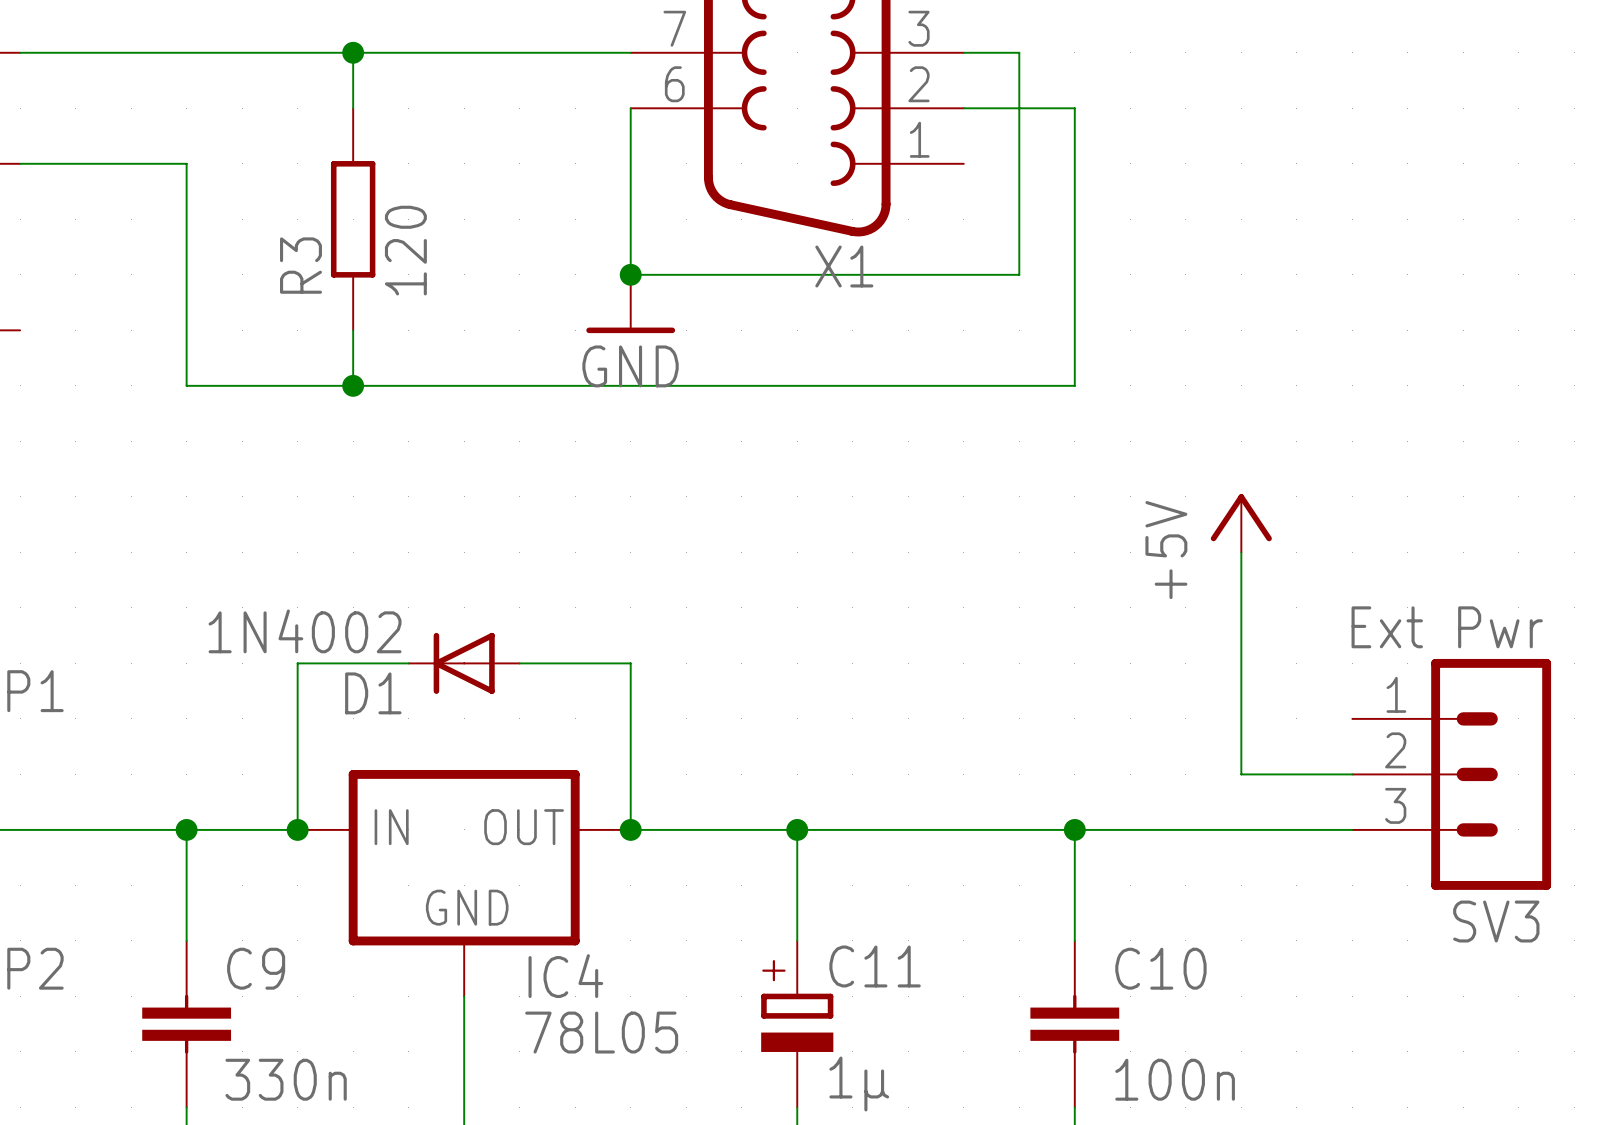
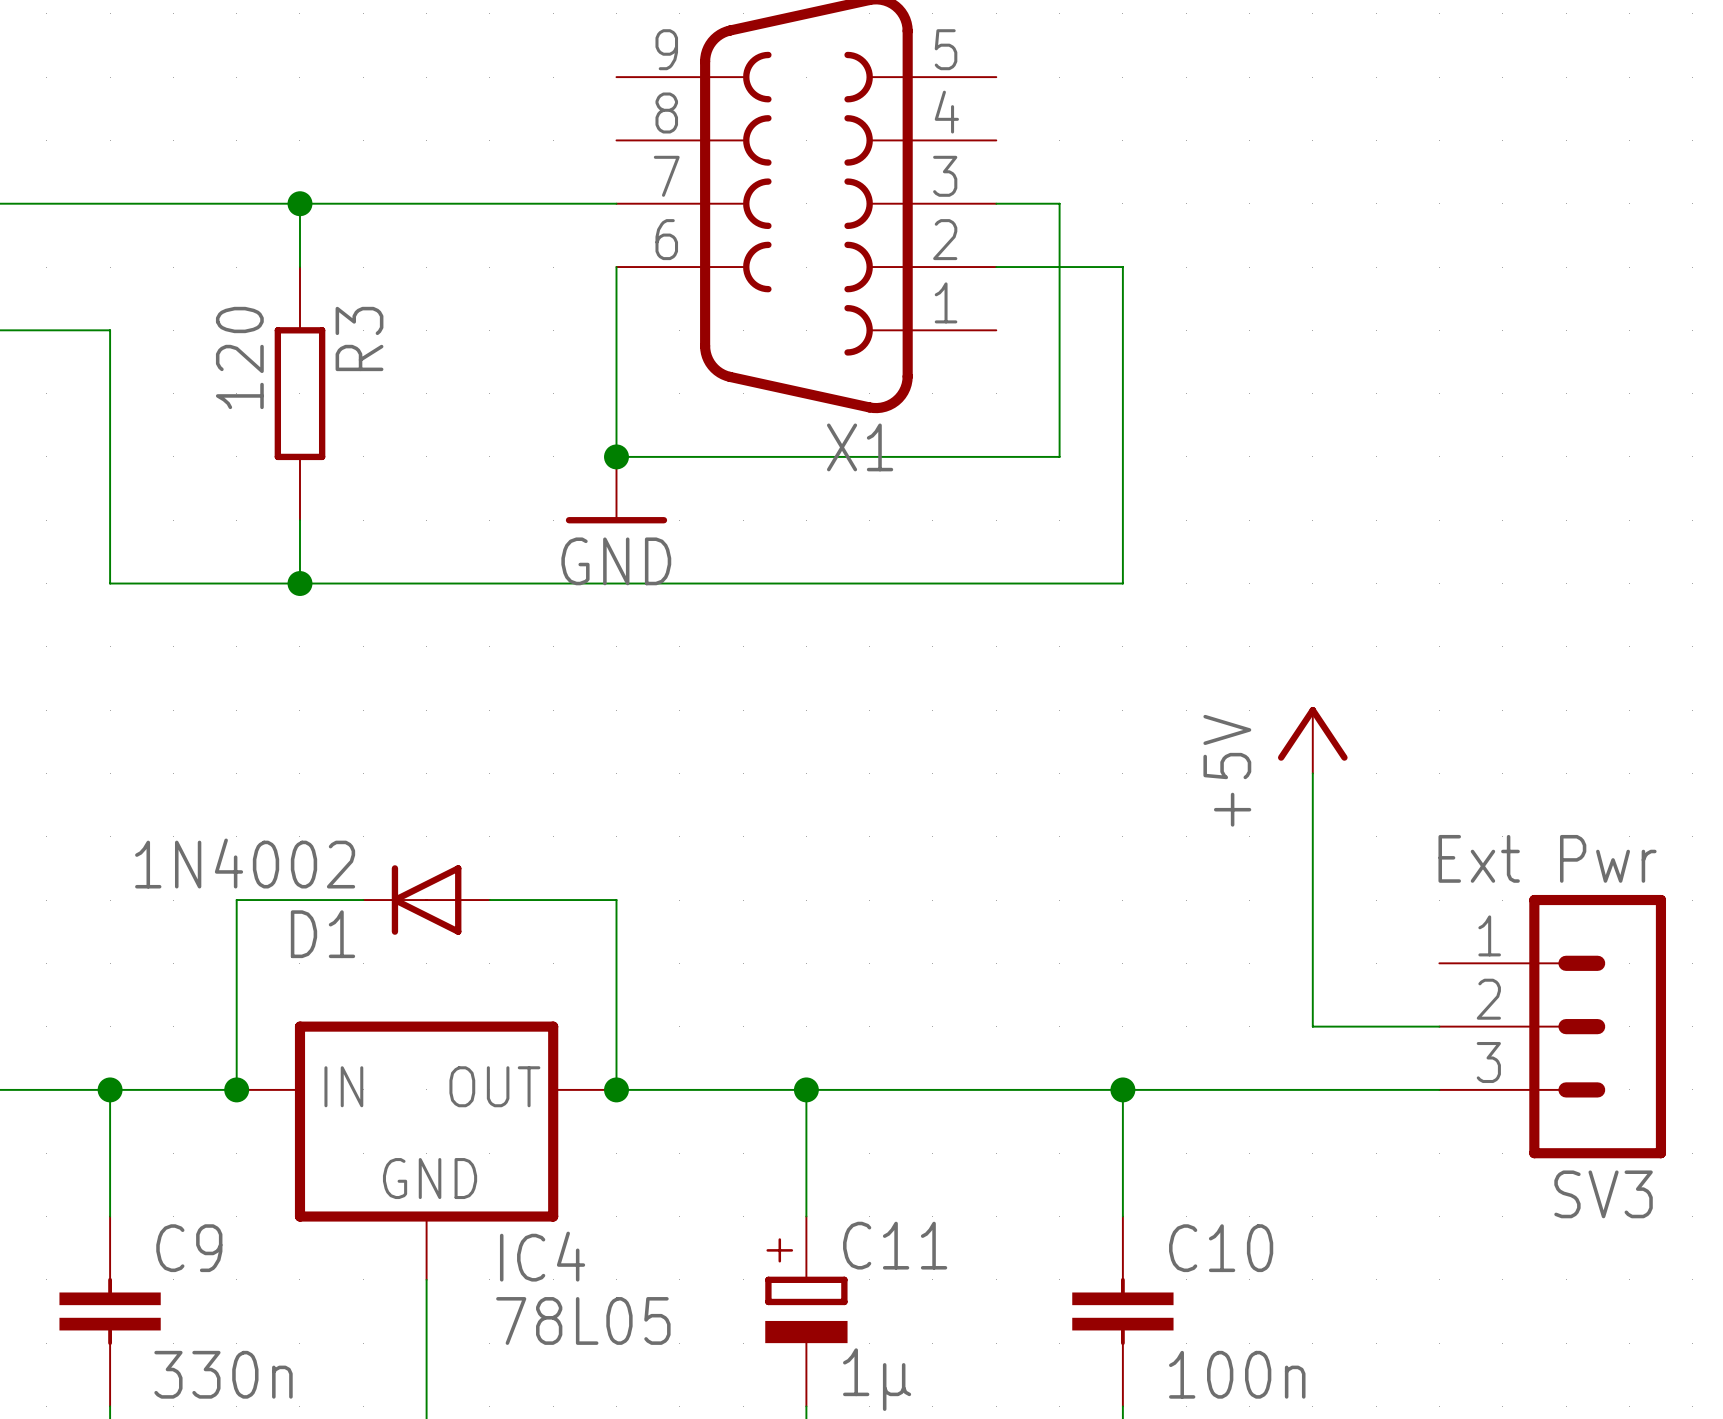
R3 value position: 120 (405, 250) -> 120 (239, 357)
R3 name position: R3 (300, 265) -> R3 (359, 338)

